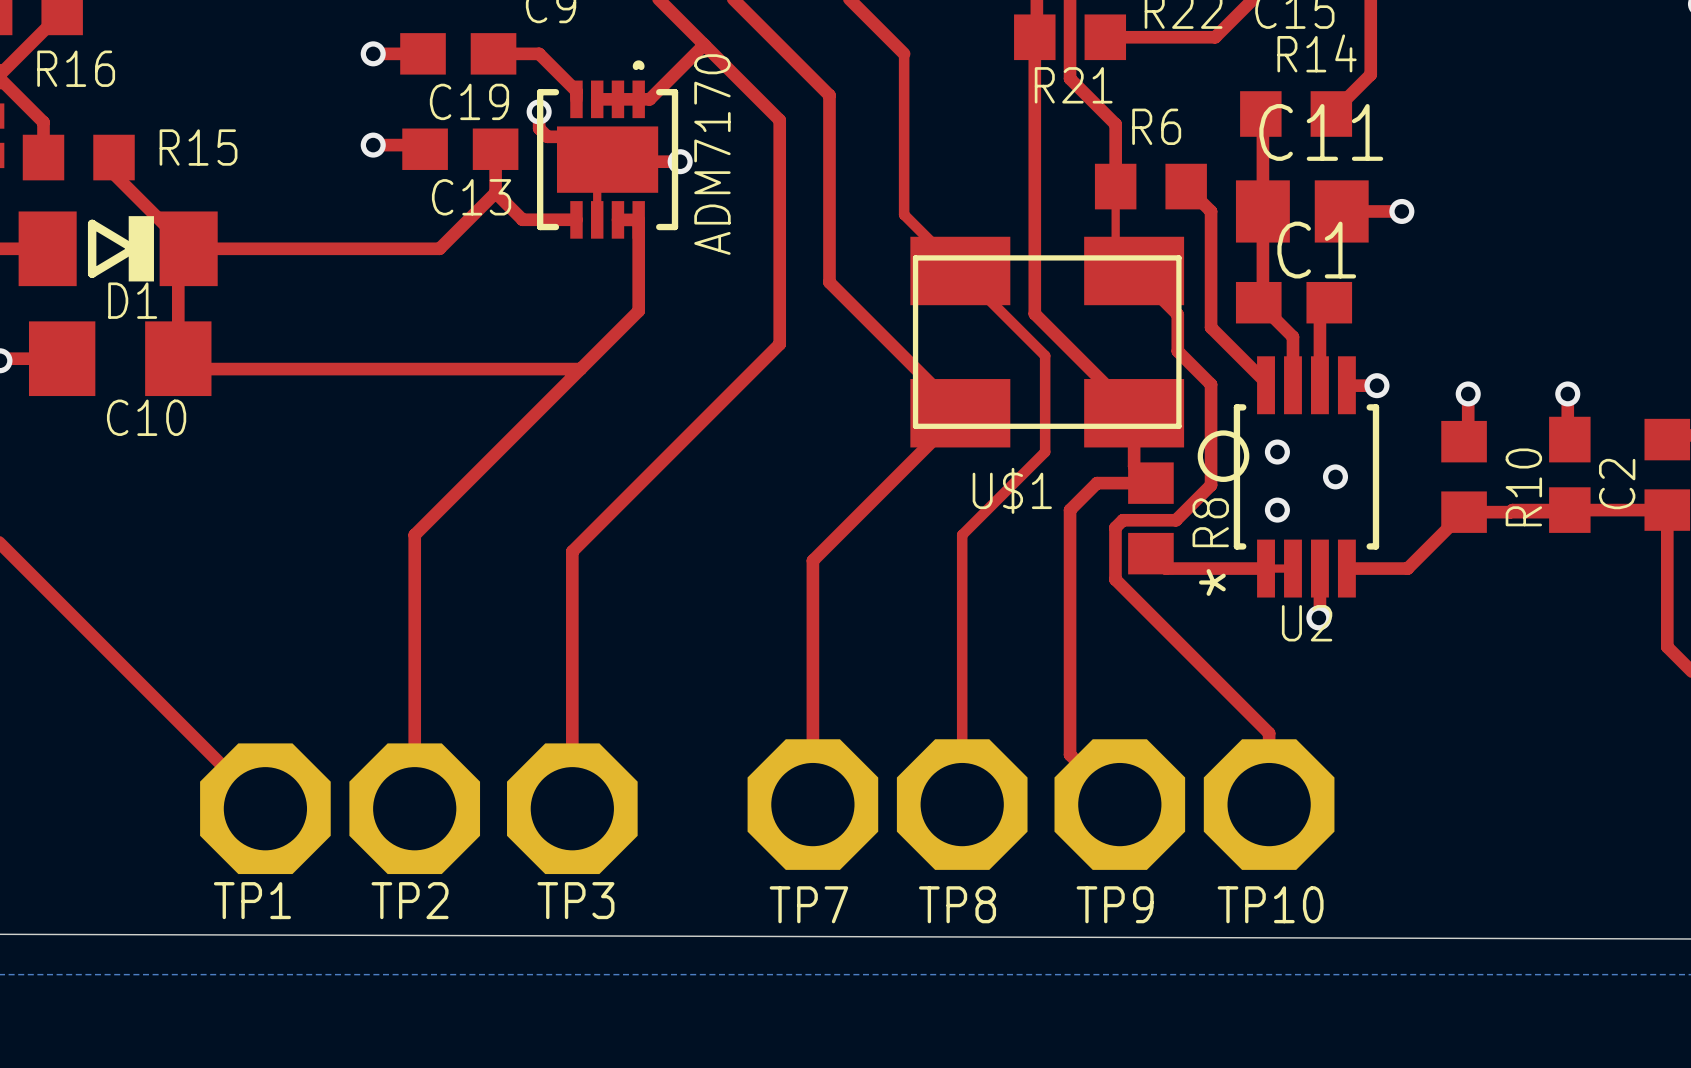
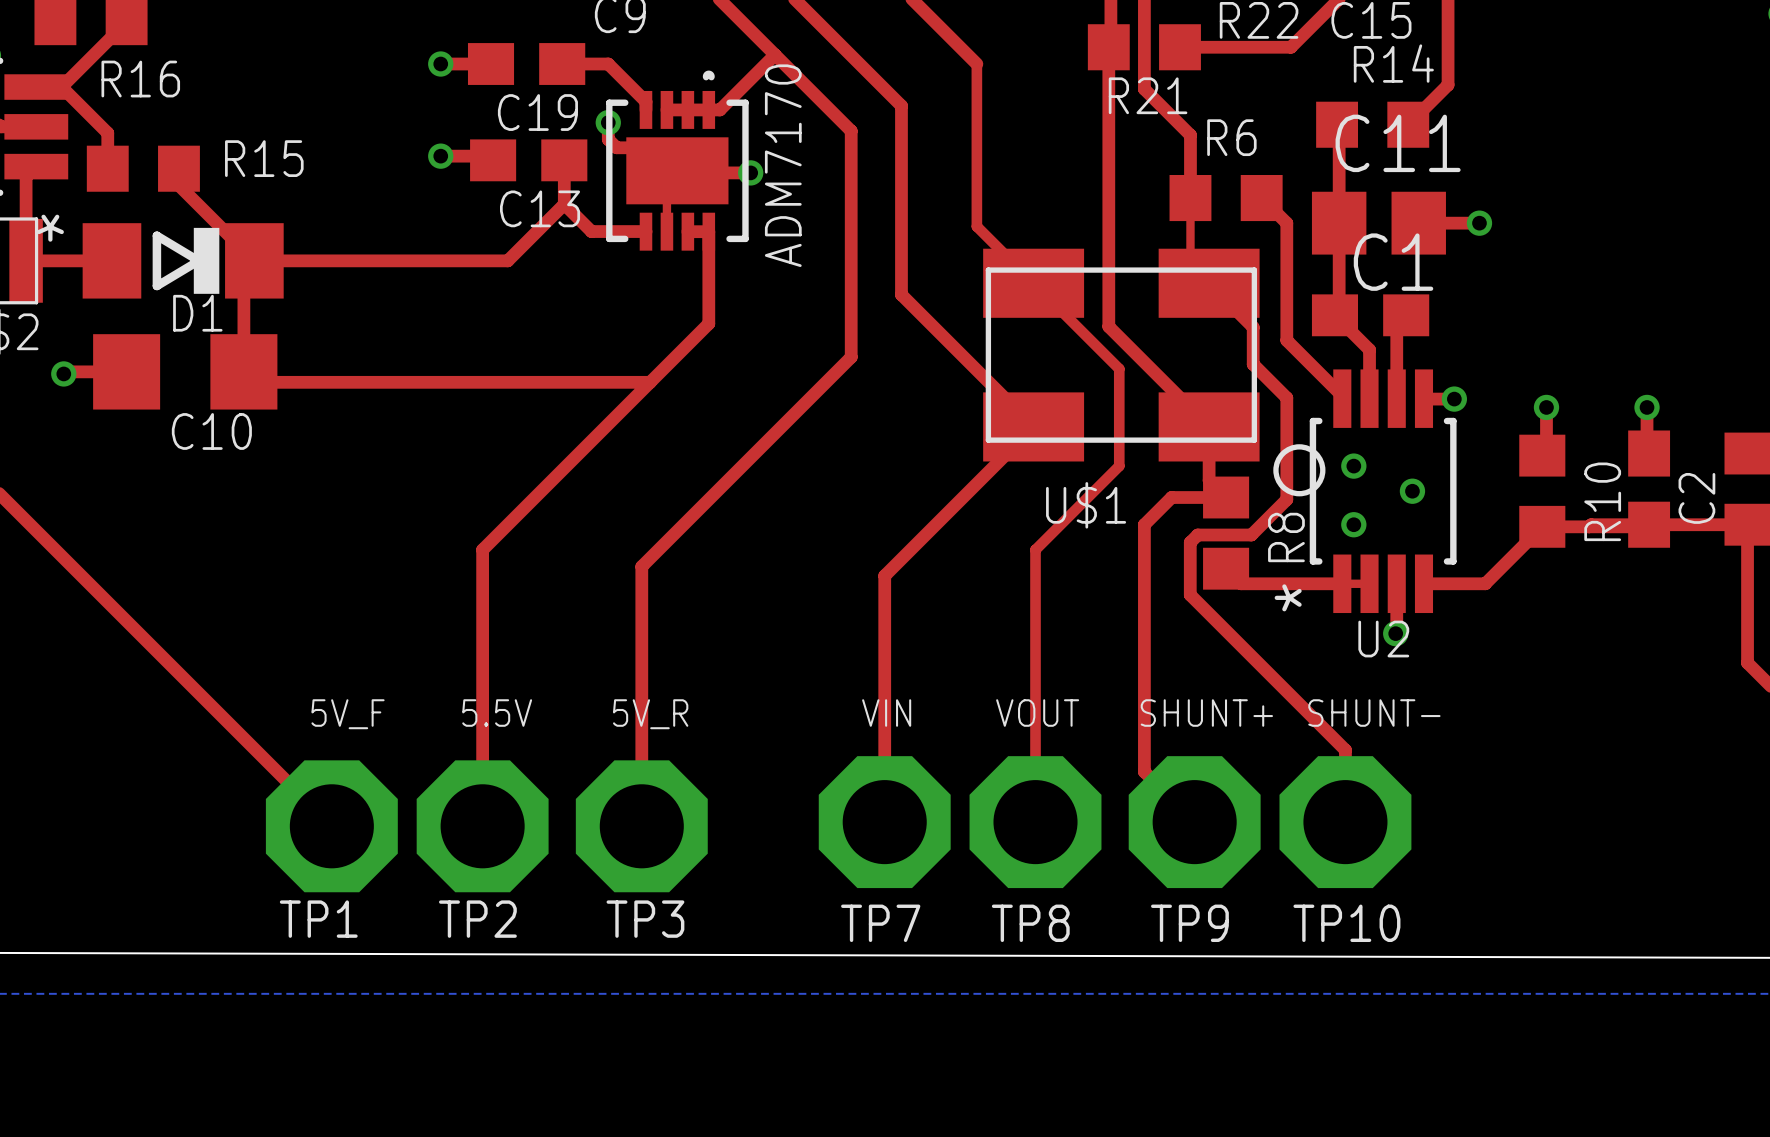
text: none -> 5.5V (497, 713)
text: none -> VIN (886, 713)
text: none -> VOUT (1037, 713)
text: none -> SHUNT+ (1206, 713)
text: none -> SHUNT- (1374, 713)
text: none -> 5V_F (348, 714)
text: none -> 5V_R (650, 714)

